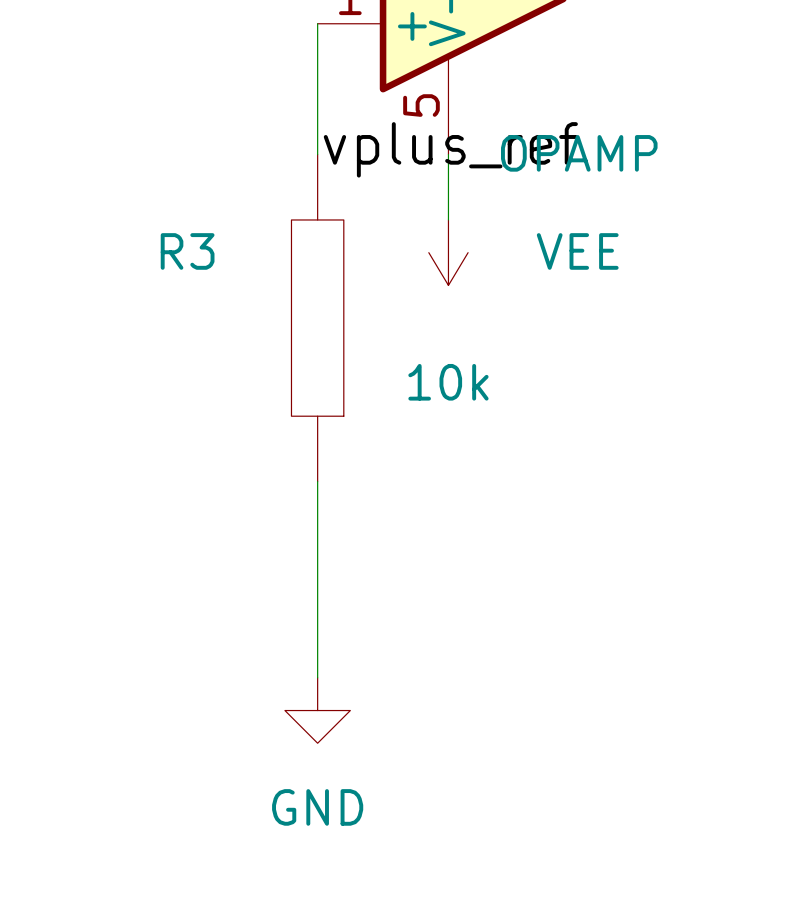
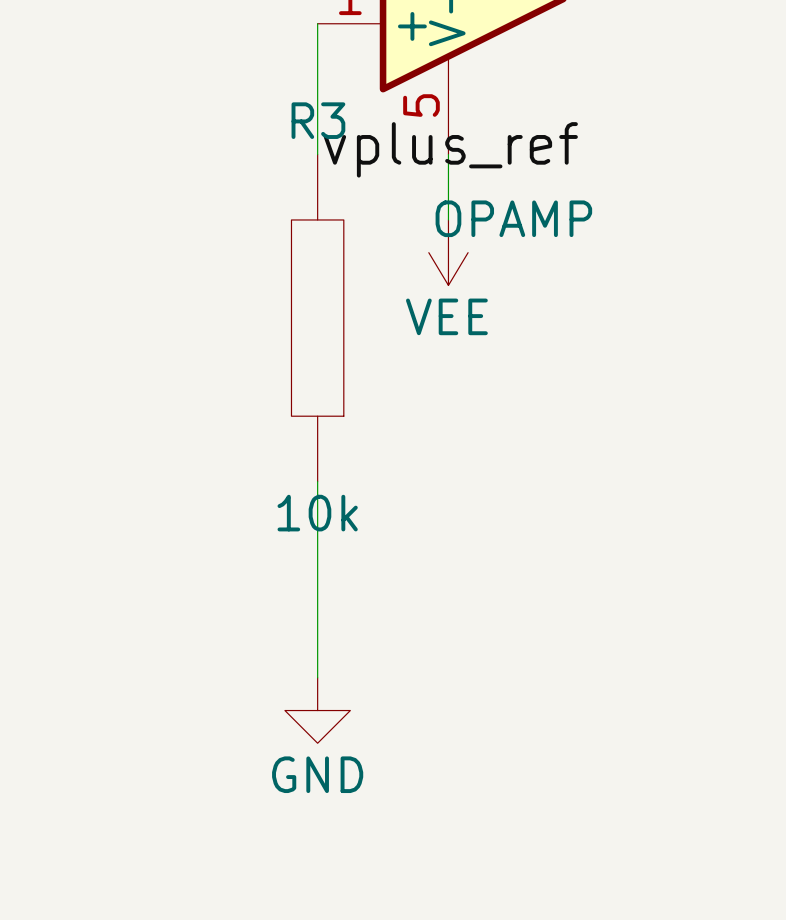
part value position: OPAMP (579, 153) -> OPAMP (513, 218)
R3 name position: R3 (187, 251) -> R3 (318, 120)
power symbol text position: VEE (577, 251) -> VEE (446, 316)
R3 value position: 10k (448, 382) -> 10k (317, 513)
power symbol text position: GND (317, 807) -> GND (317, 774)

